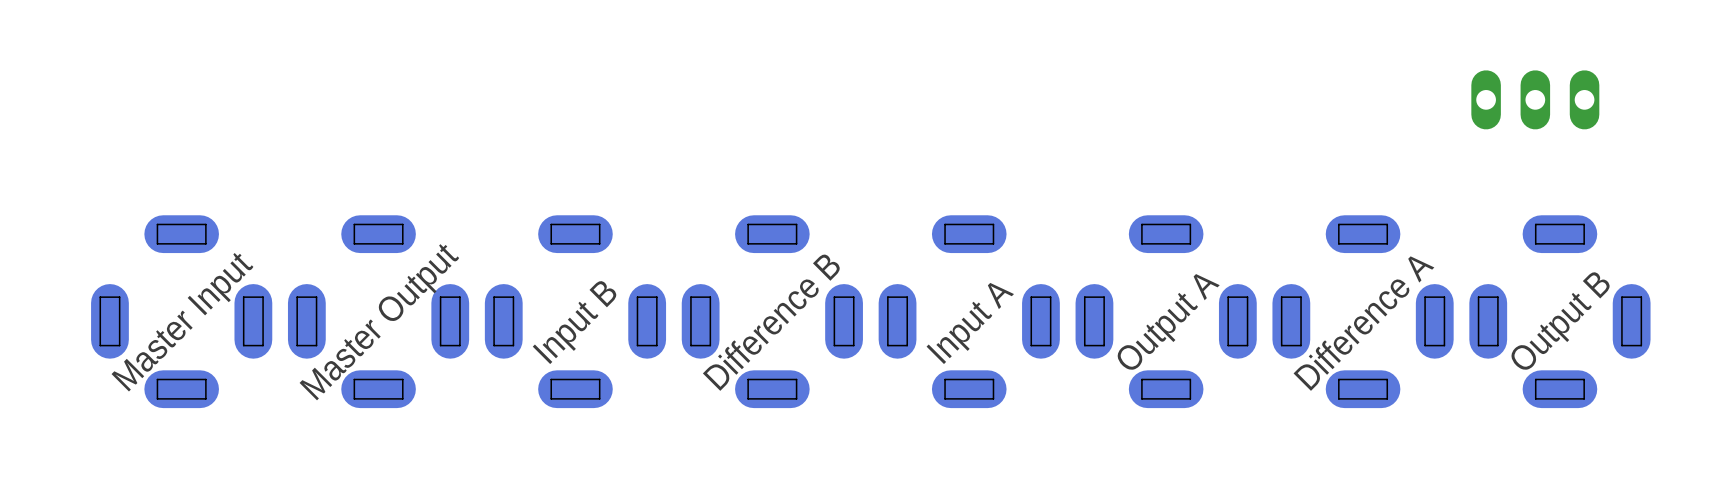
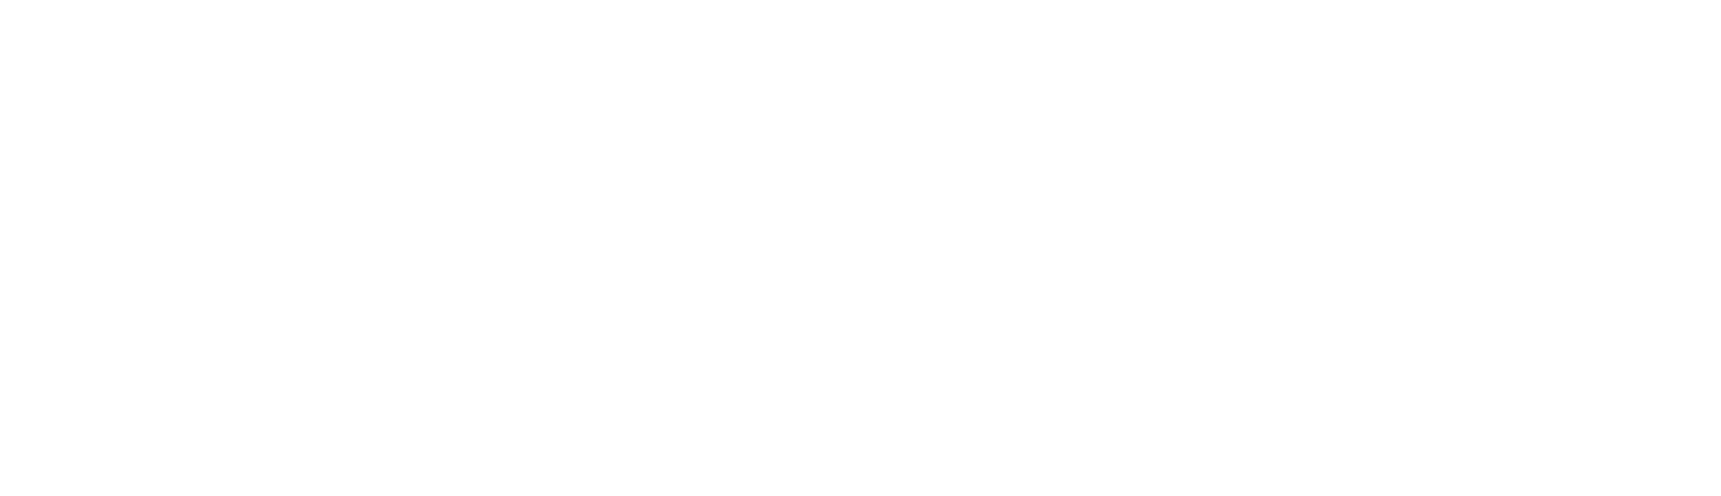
part: (1535, 99) -> none
part: (181, 311) -> none
part: (378, 311) -> none
part: (575, 311) -> none
part: (772, 311) -> none
part: (969, 311) -> none
part: (1166, 311) -> none
part: (1363, 311) -> none
part: (1559, 311) -> none

